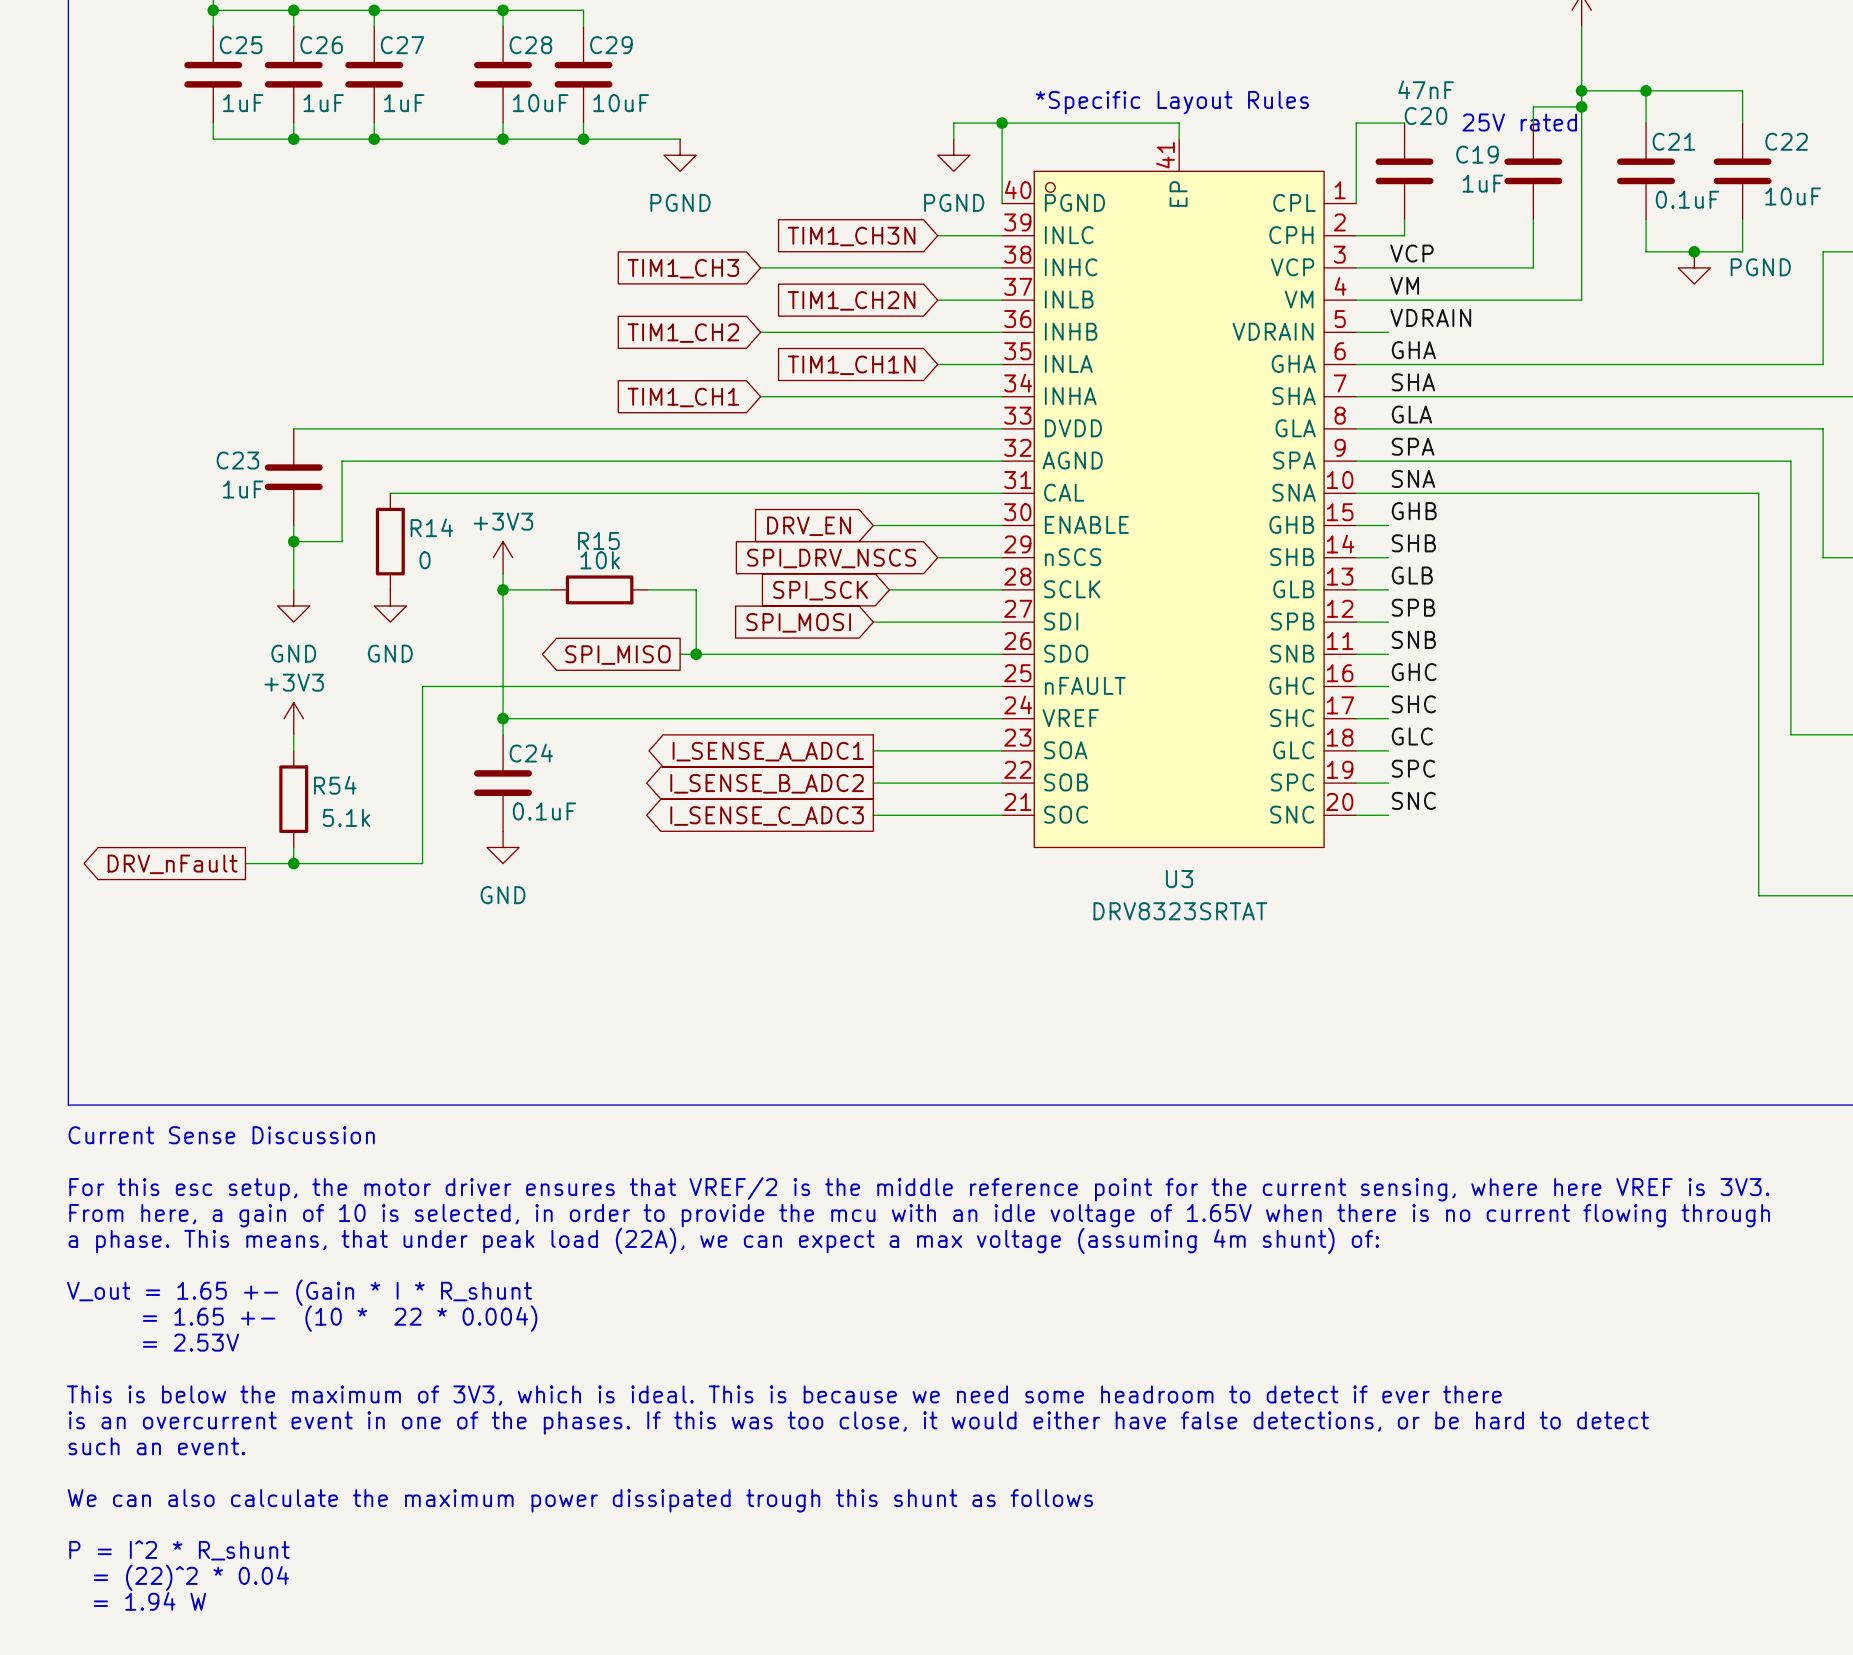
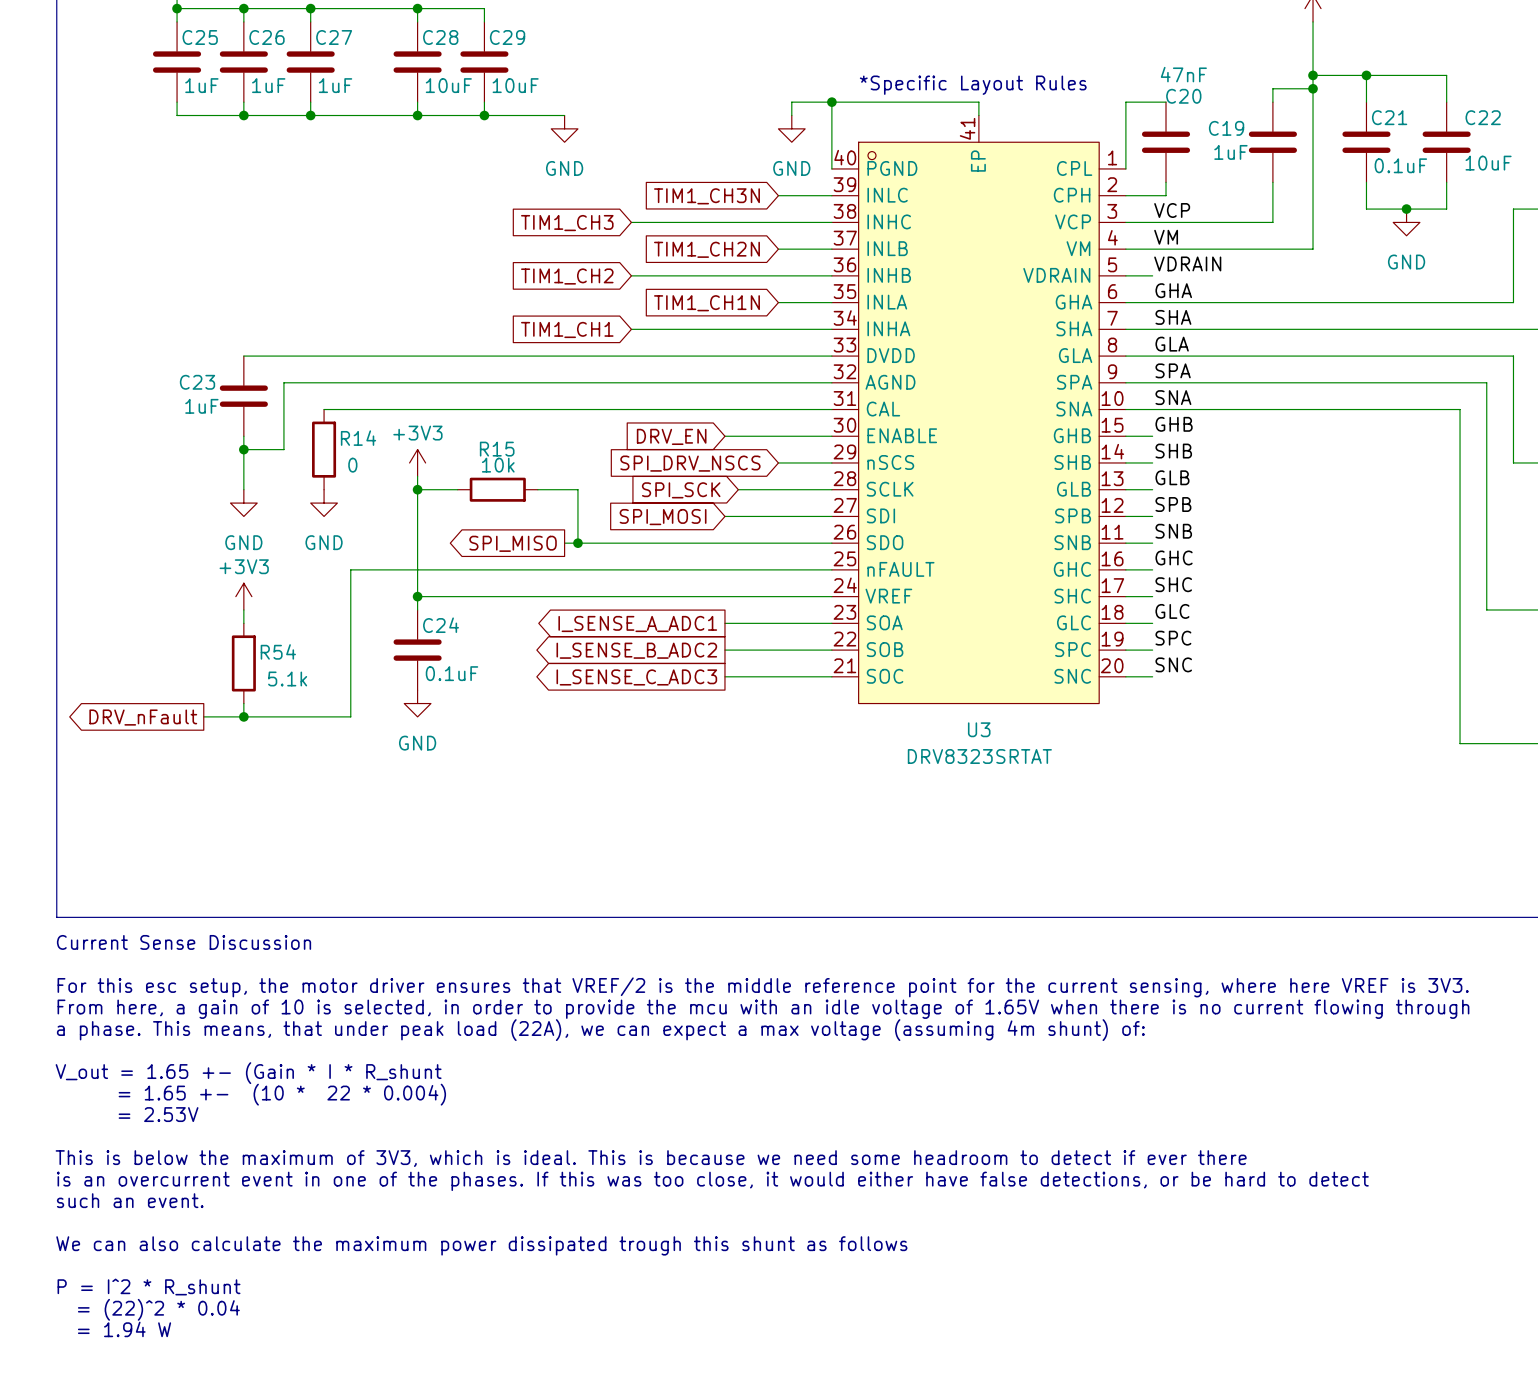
text: 25V rated (1519, 122) -> none
power symbol: PGND (680, 155) -> GND (564, 128)
power symbol: PGND (953, 155) -> GND (791, 128)
power symbol: PGND (1694, 267) -> GND (1406, 222)

